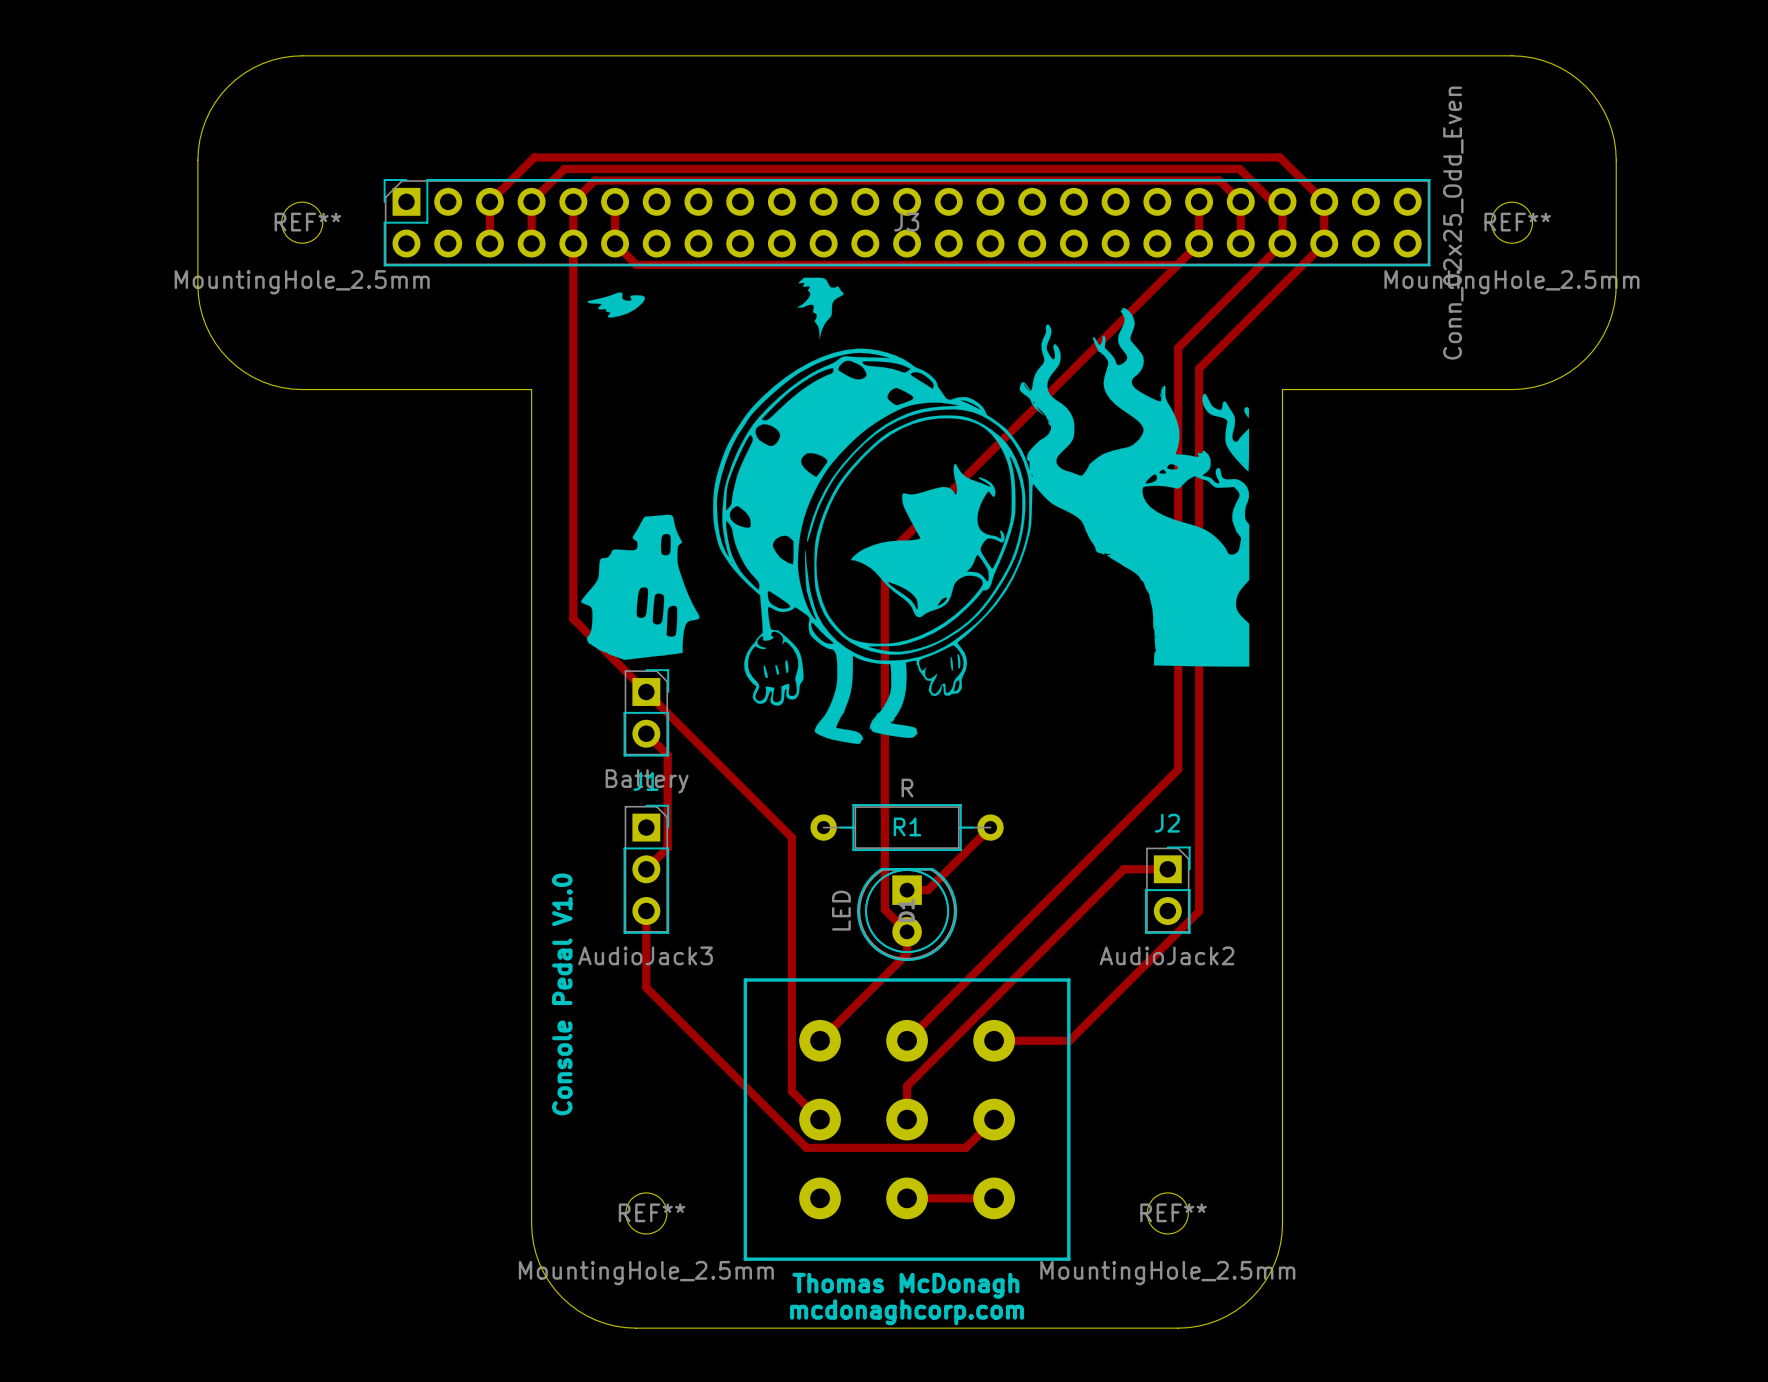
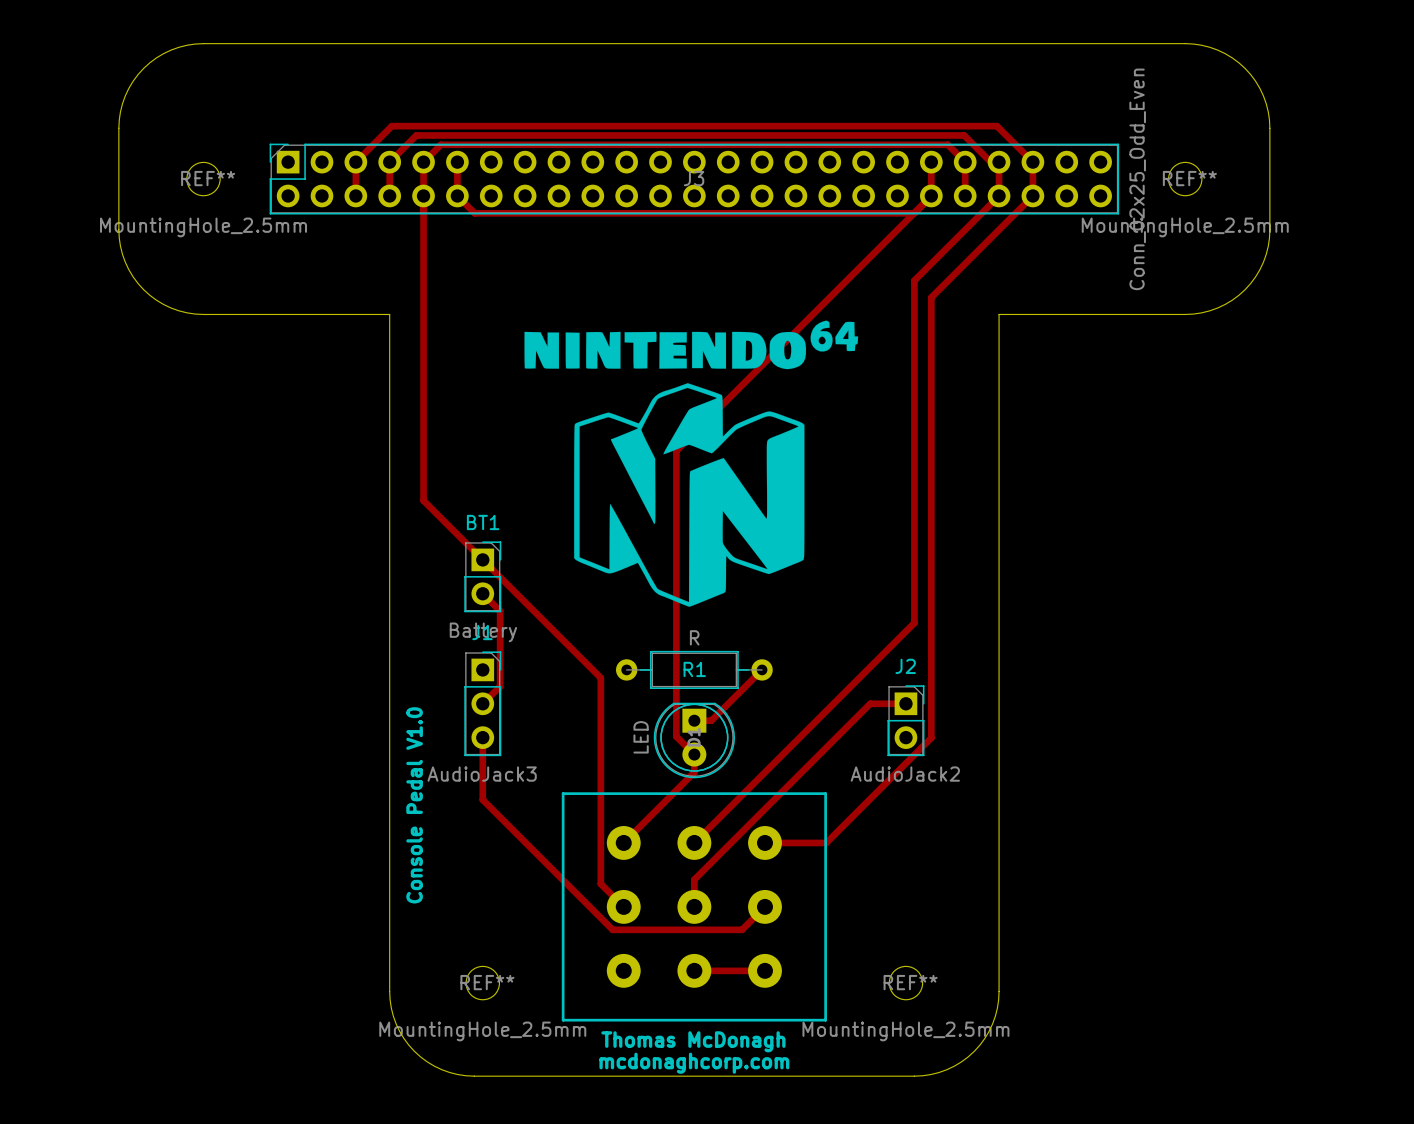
drawing: [581, 277, 1250, 744] -> none
drawing: none -> [524, 320, 859, 607]

